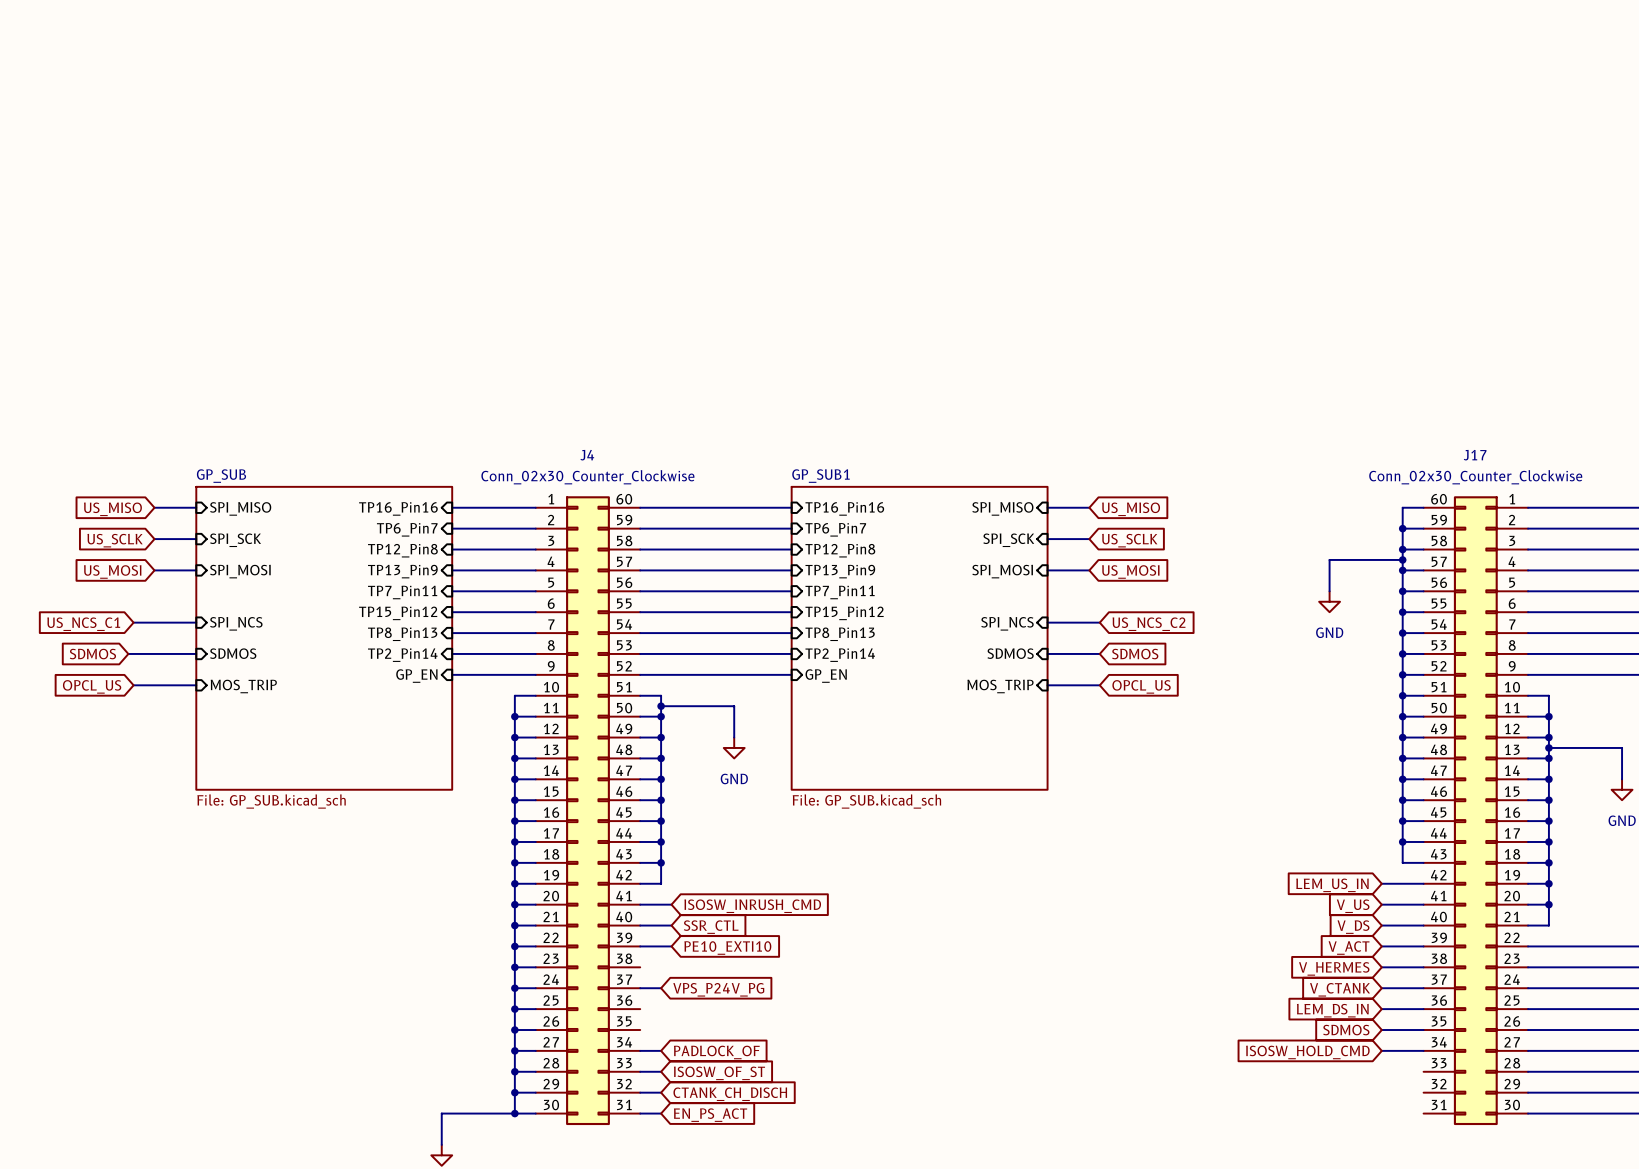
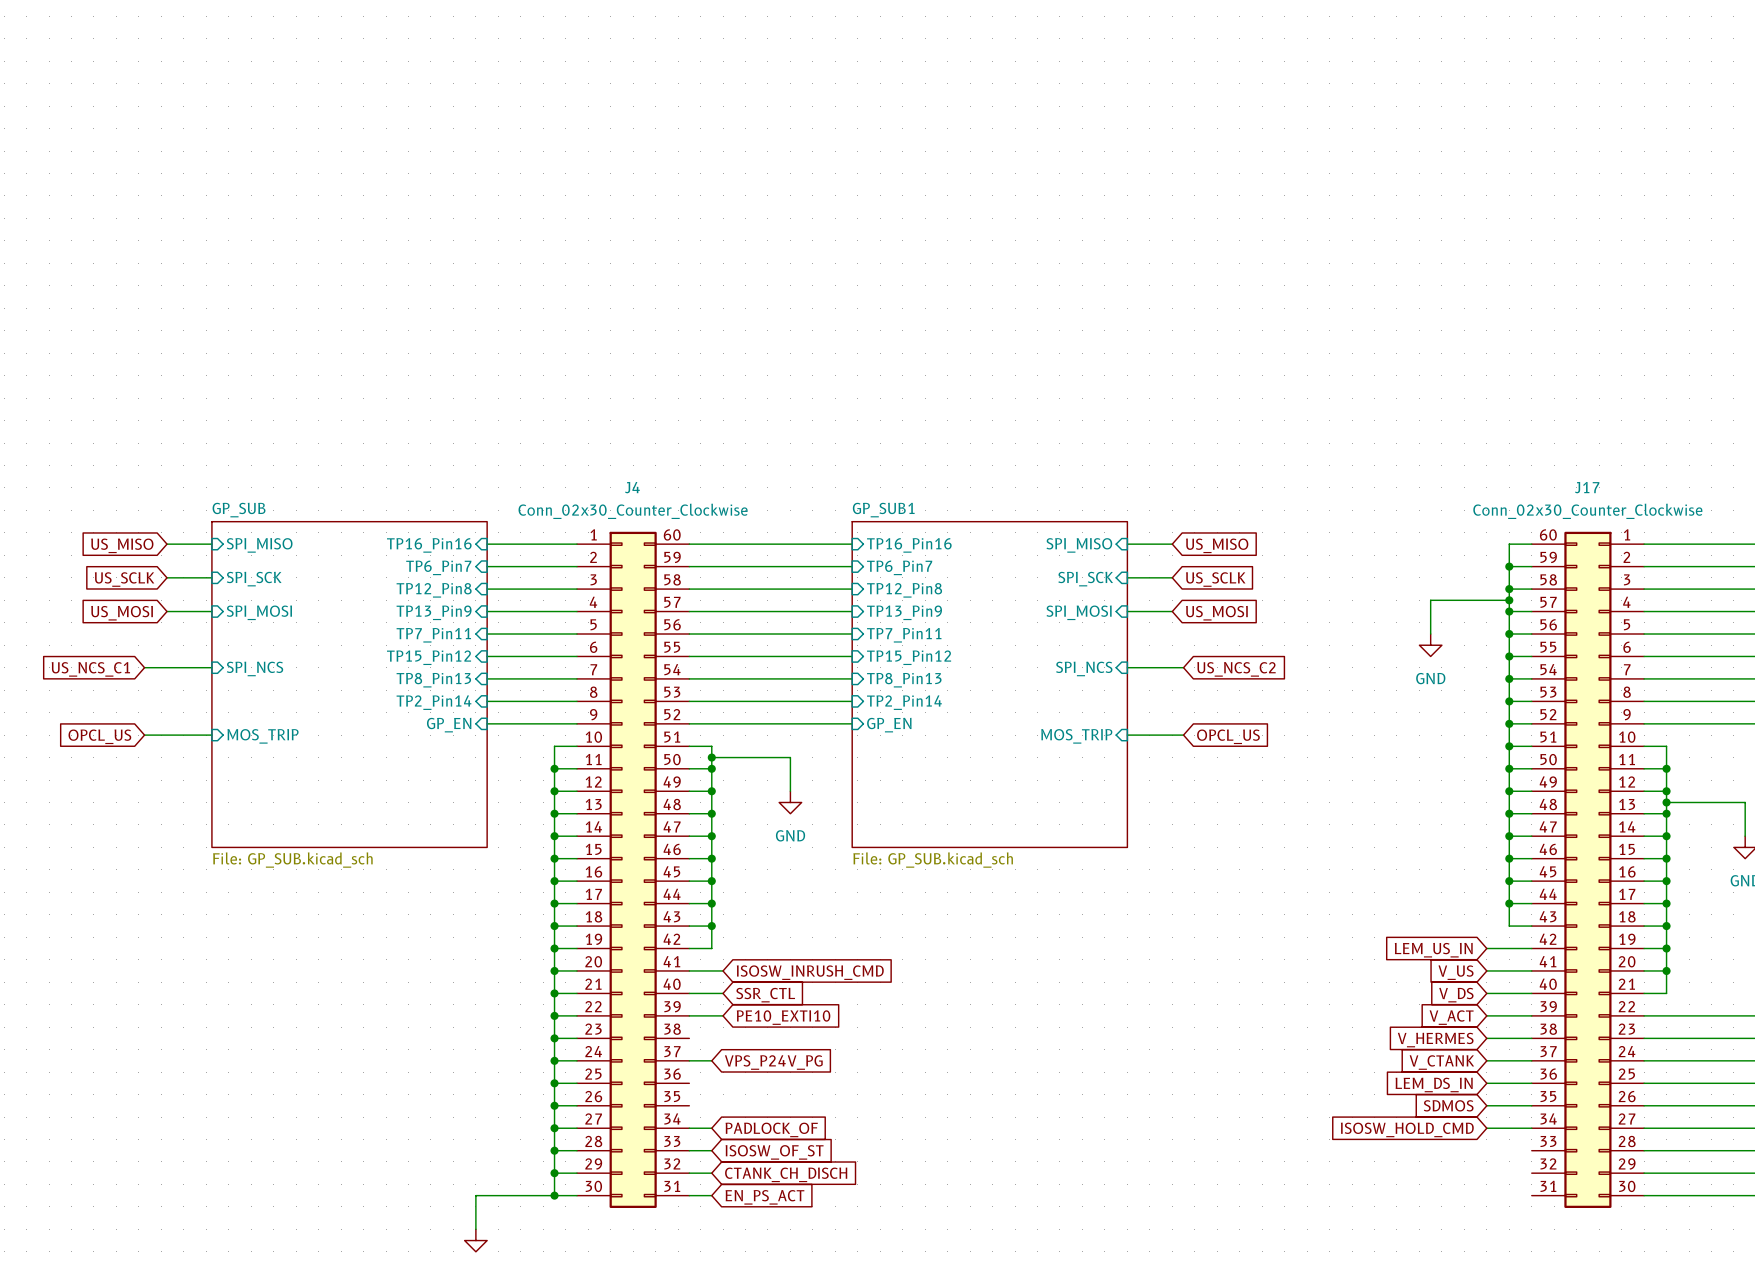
wire: (128, 653) (196, 653) -> none
sheet pin: SDMOS (233, 653) -> none
sheet pin: SDMOS (1010, 653) -> none
wire: (1047, 653) (1099, 653) -> none
global label: SDMOS (92, 654) -> none
global label: SDMOS (1135, 654) -> none

